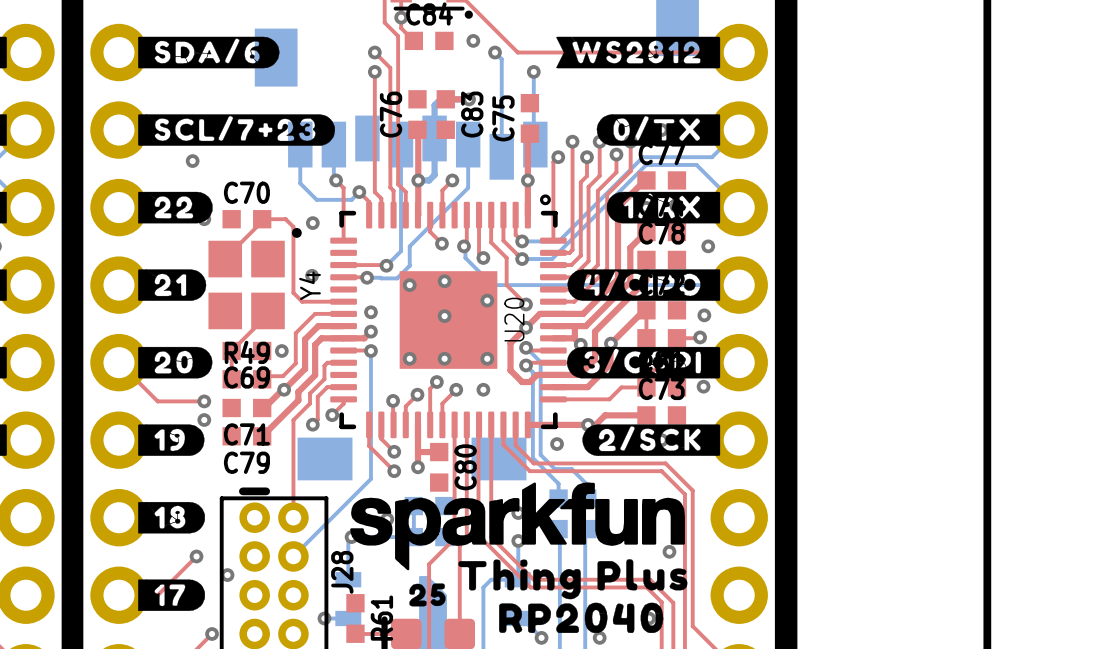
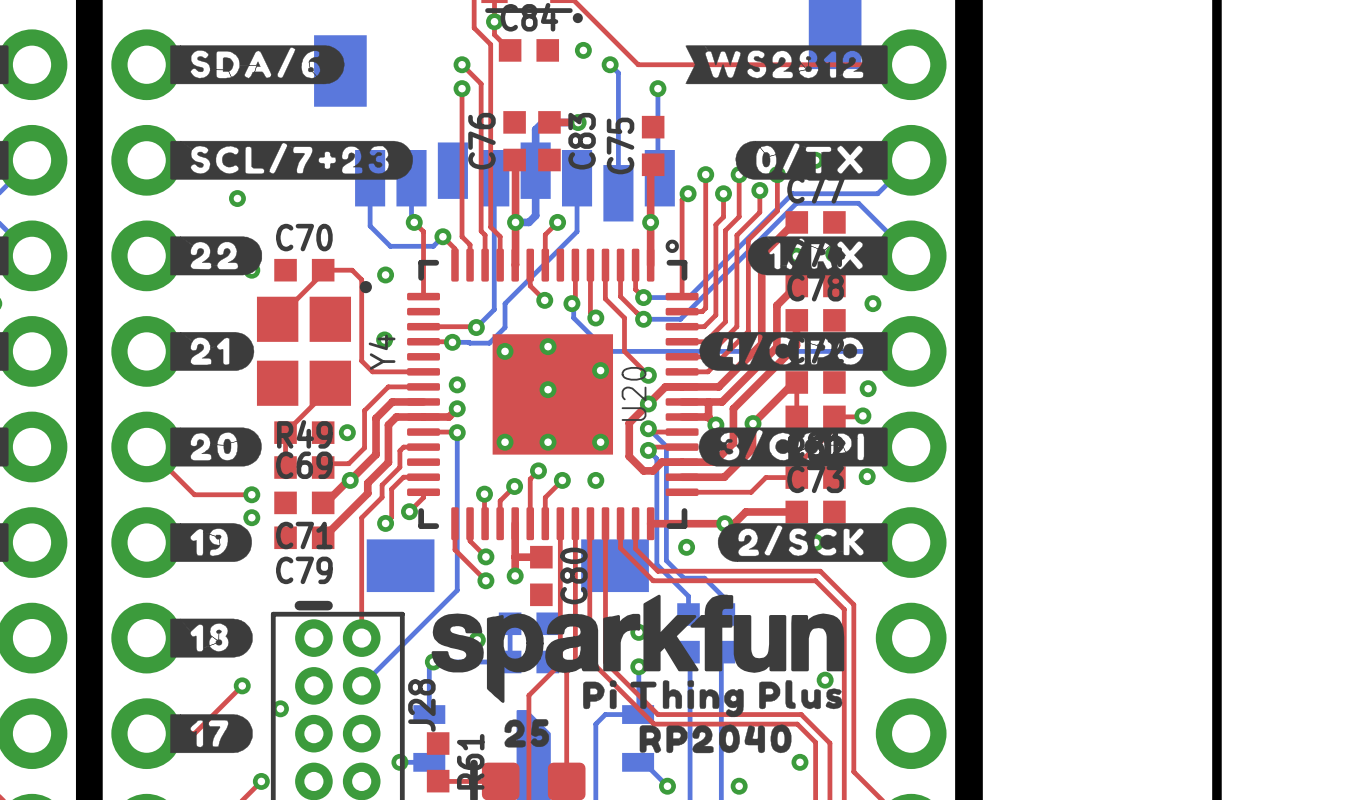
drawing: none -> [583, 680, 843, 754]
drawing: [458, 559, 688, 633] -> none

